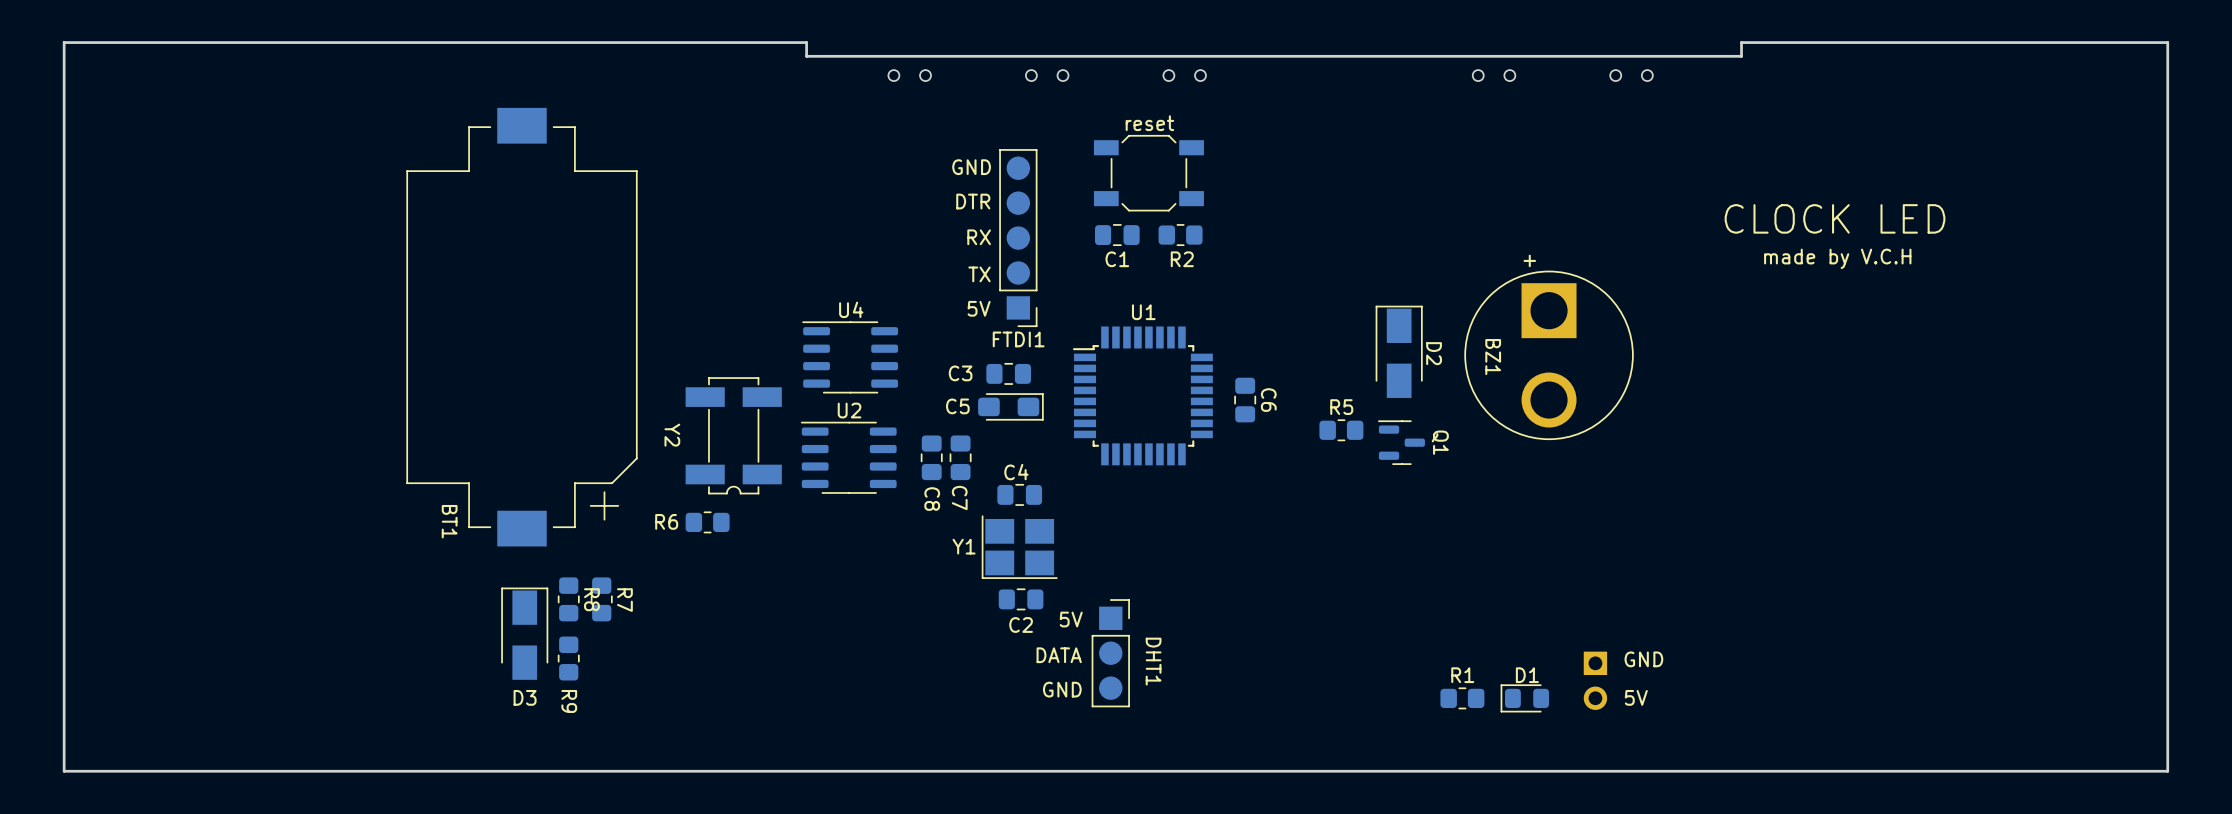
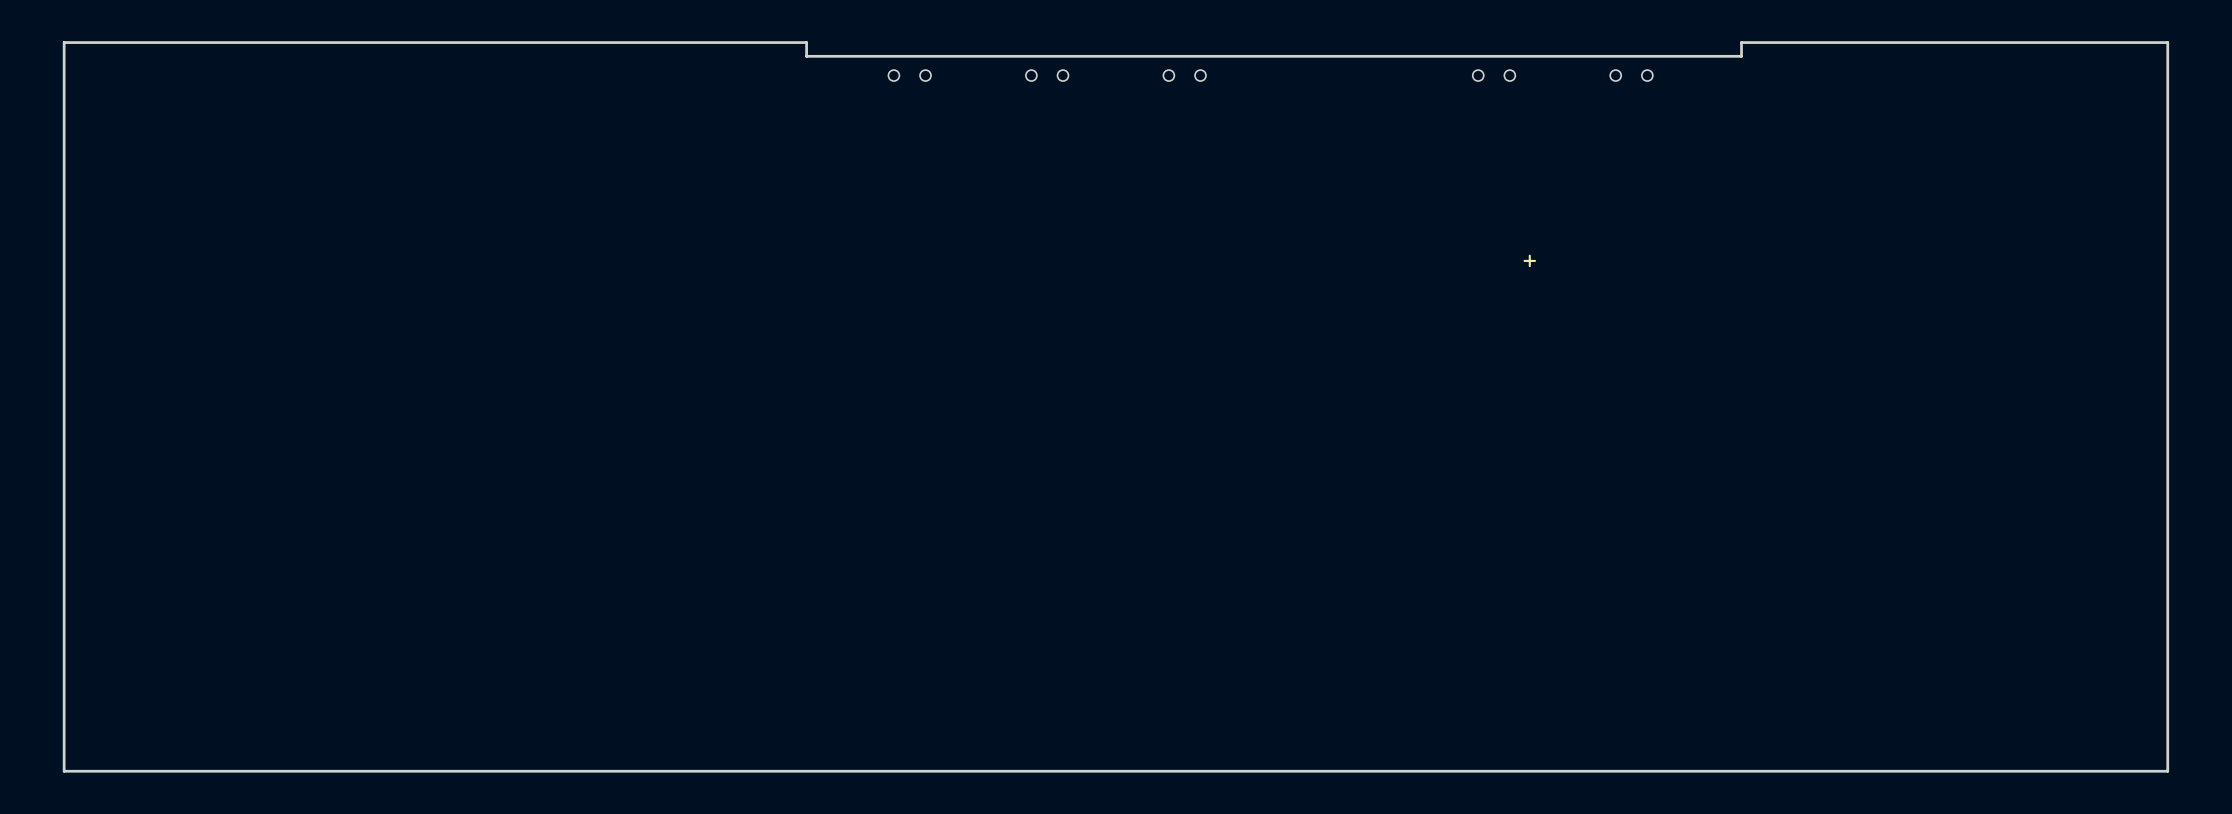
text: GND (971, 167) -> none
reset: (1148, 173) -> none
text: DTR (973, 201) -> none
text: CLOCK LED (1835, 218) -> none
C1: (1117, 235) -> none
R2: (1180, 235) -> none
text: RX (979, 237) -> none
FTDI1: (1018, 238) -> none
text: made by V.C.H (1837, 258) -> none
text: TX (979, 274) -> none
text: 5V (979, 308) -> none
BT1: (521, 327) -> none
D2: (1399, 351) -> none
BZ1: (1549, 355) -> none
U4: (850, 357) -> none
C3: (1008, 373) -> none
U1: (1142, 395) -> none
C6: (1245, 400) -> none
C5: (1010, 406) -> none
R5: (1341, 430) -> none
Y2: (733, 435) -> none
Q1: (1401, 442) -> none
U2: (848, 457) -> none
C8: (931, 457) -> none
C7: (960, 457) -> none
C4: (1019, 494) -> none
R6: (707, 522) -> none
Y1: (1019, 547) -> none
R8: (568, 599) -> none
R7: (601, 599) -> none
C2: (1021, 599) -> none
text: 5V (1071, 619) -> none
D3: (524, 633) -> none
DHT1: (1110, 653) -> none
text: DATA (1059, 655) -> none
R9: (568, 658) -> none
text: GND (1643, 659) -> none
part: (1595, 680) -> none
text: GND (1062, 689) -> none
text: 5V (1636, 697) -> none
R1: (1462, 698) -> none
D1: (1524, 698) -> none

